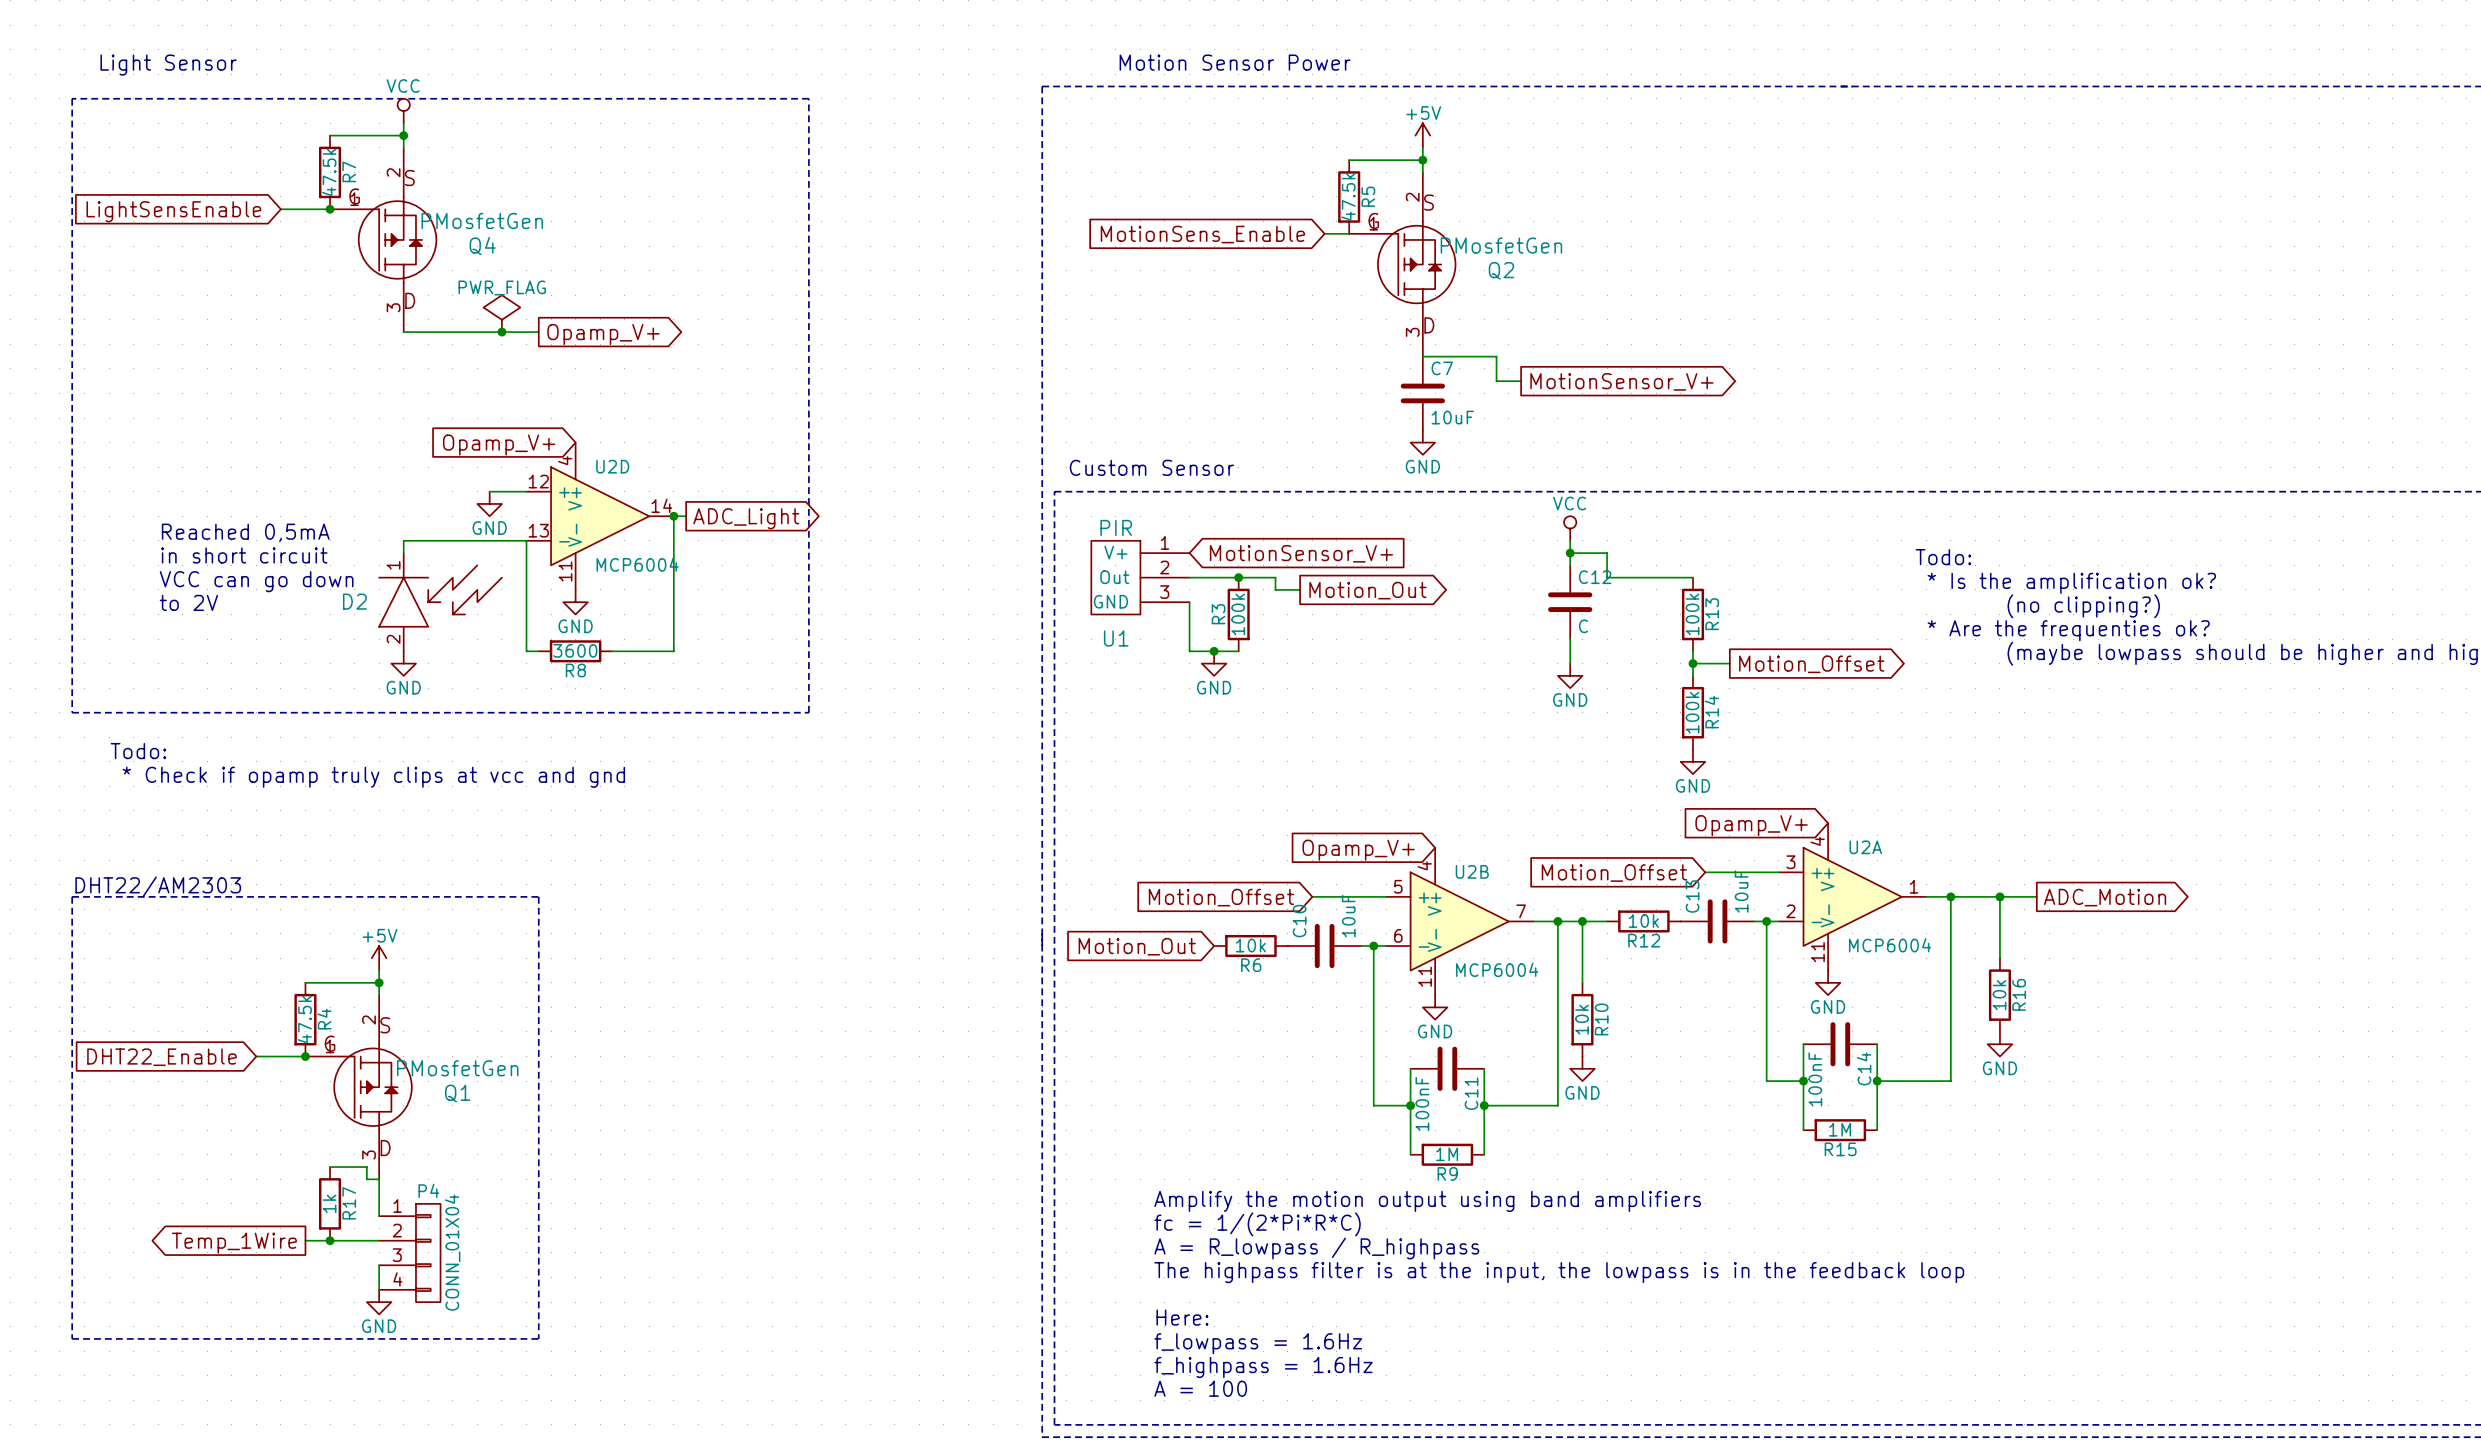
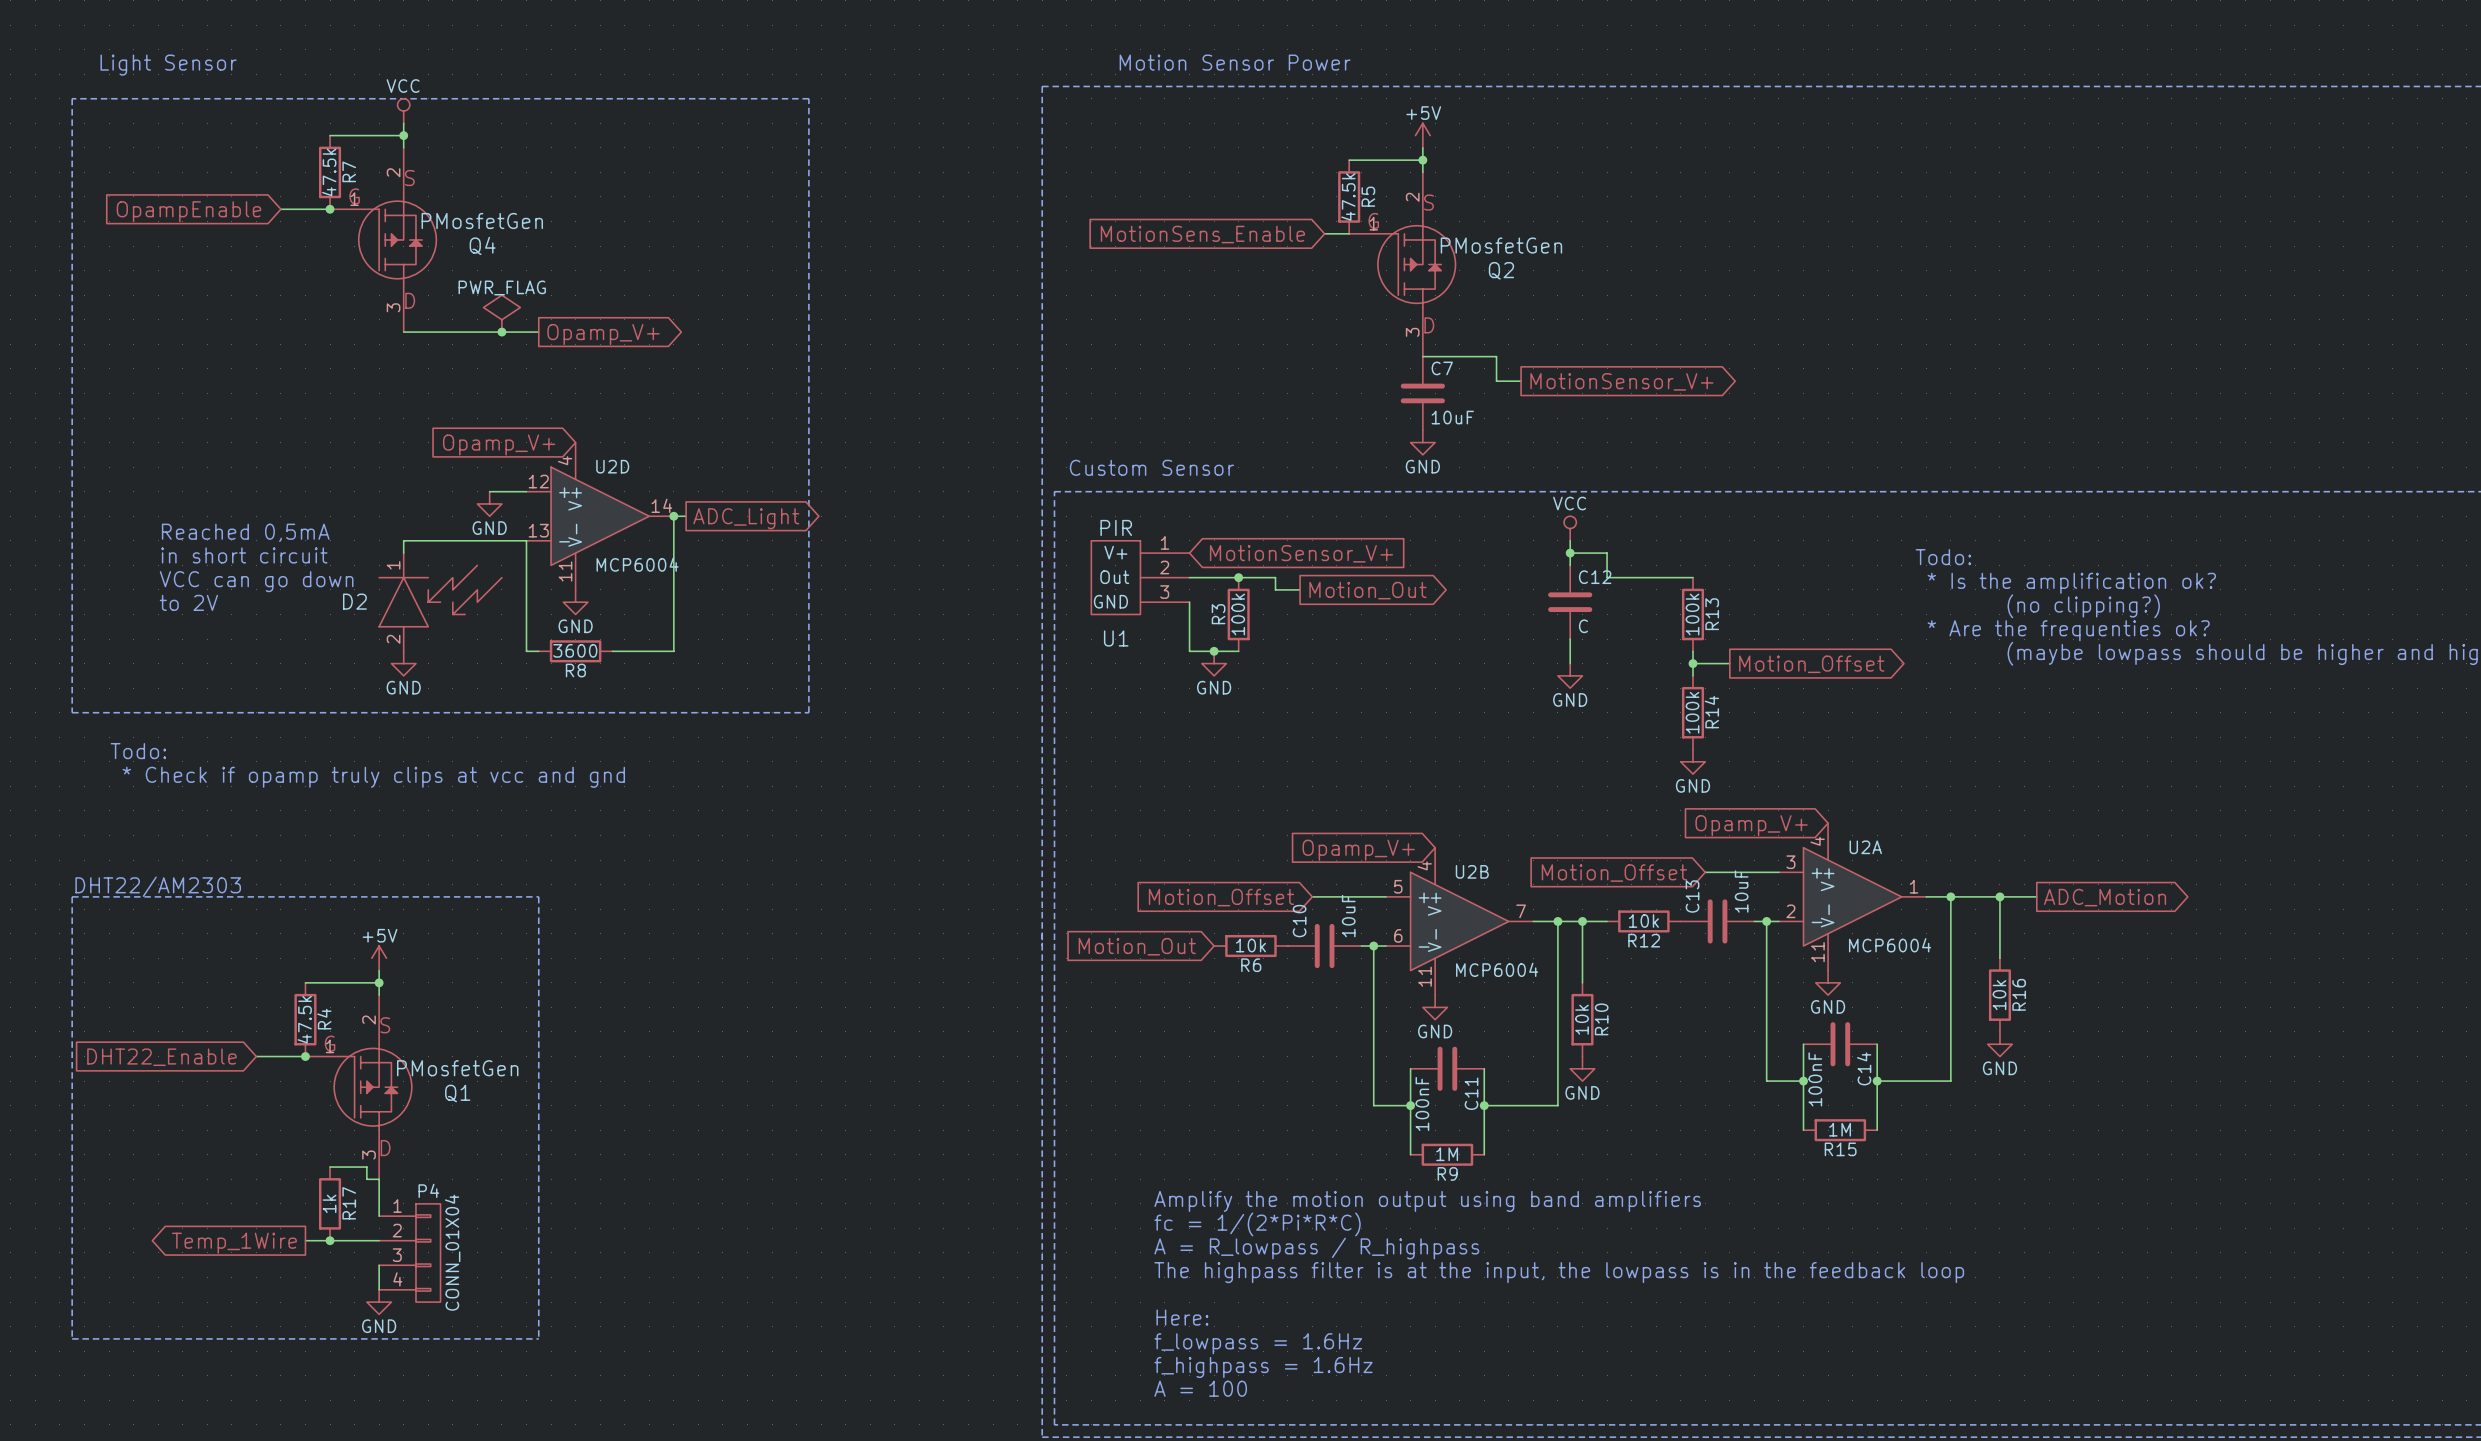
global label: LightSensEnable (173, 211) -> OpampEnable (188, 211)

